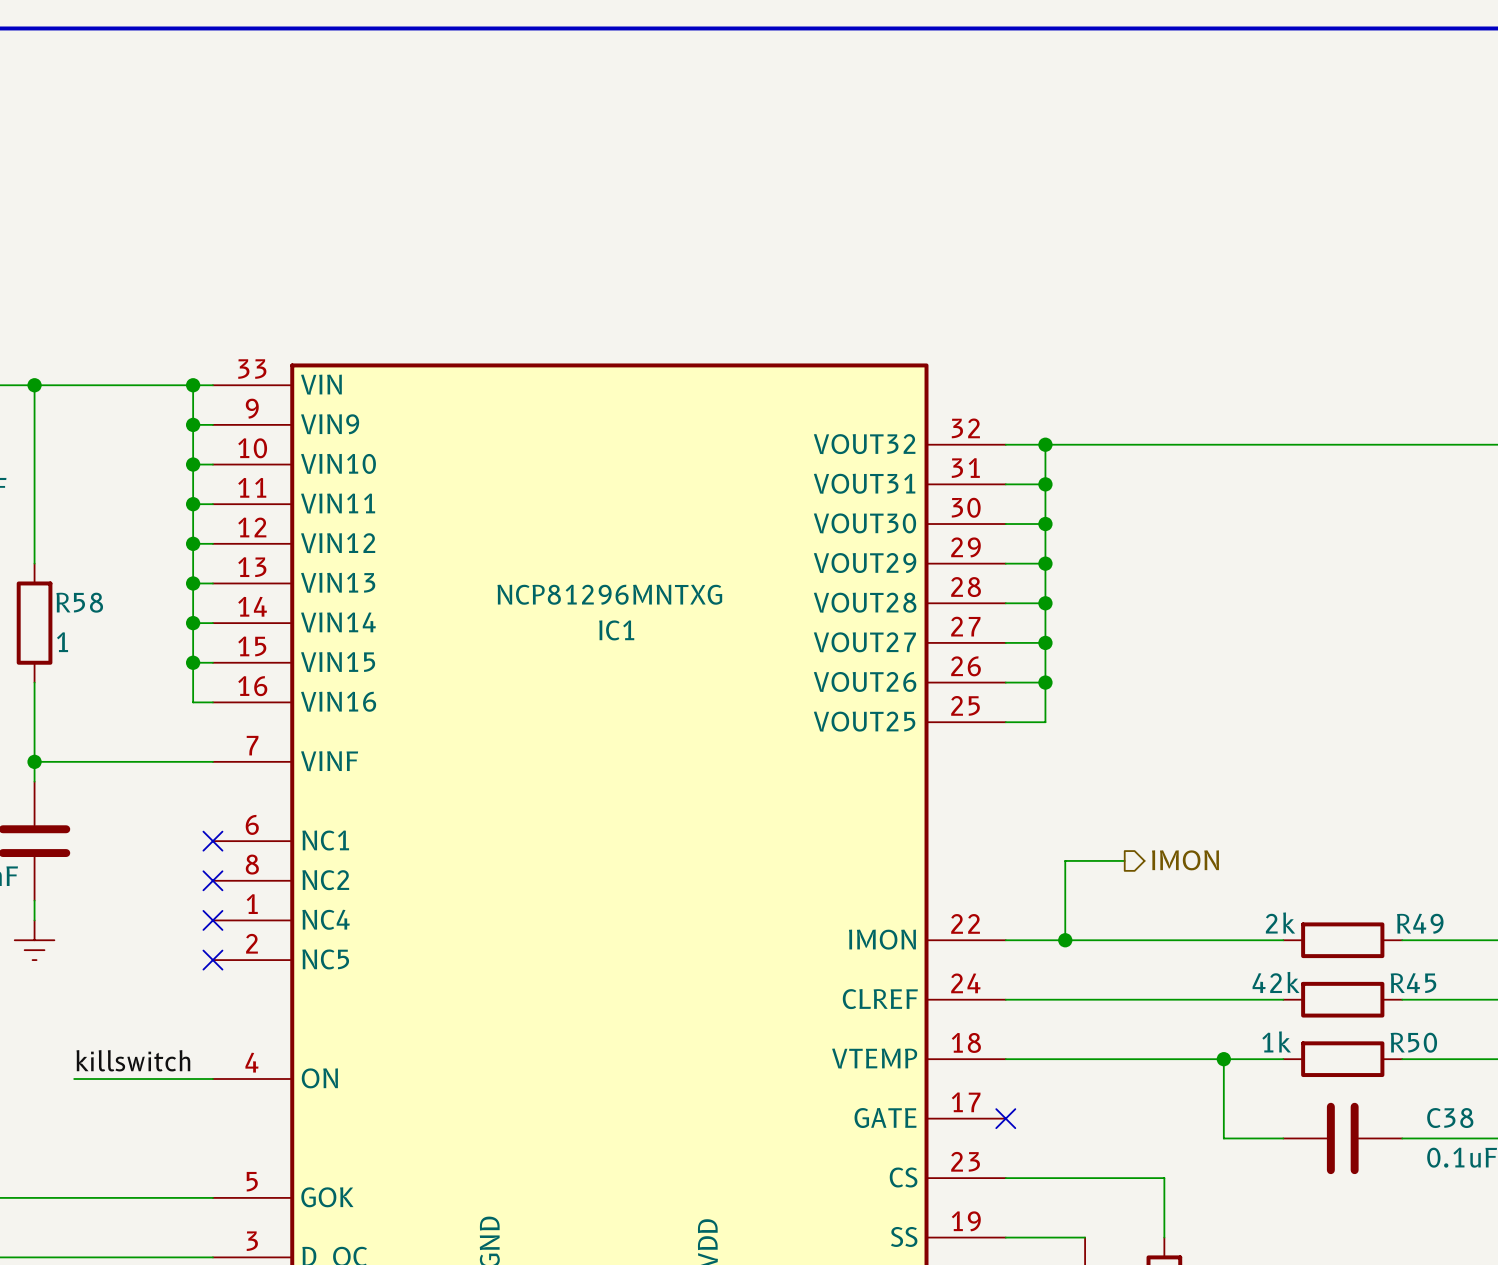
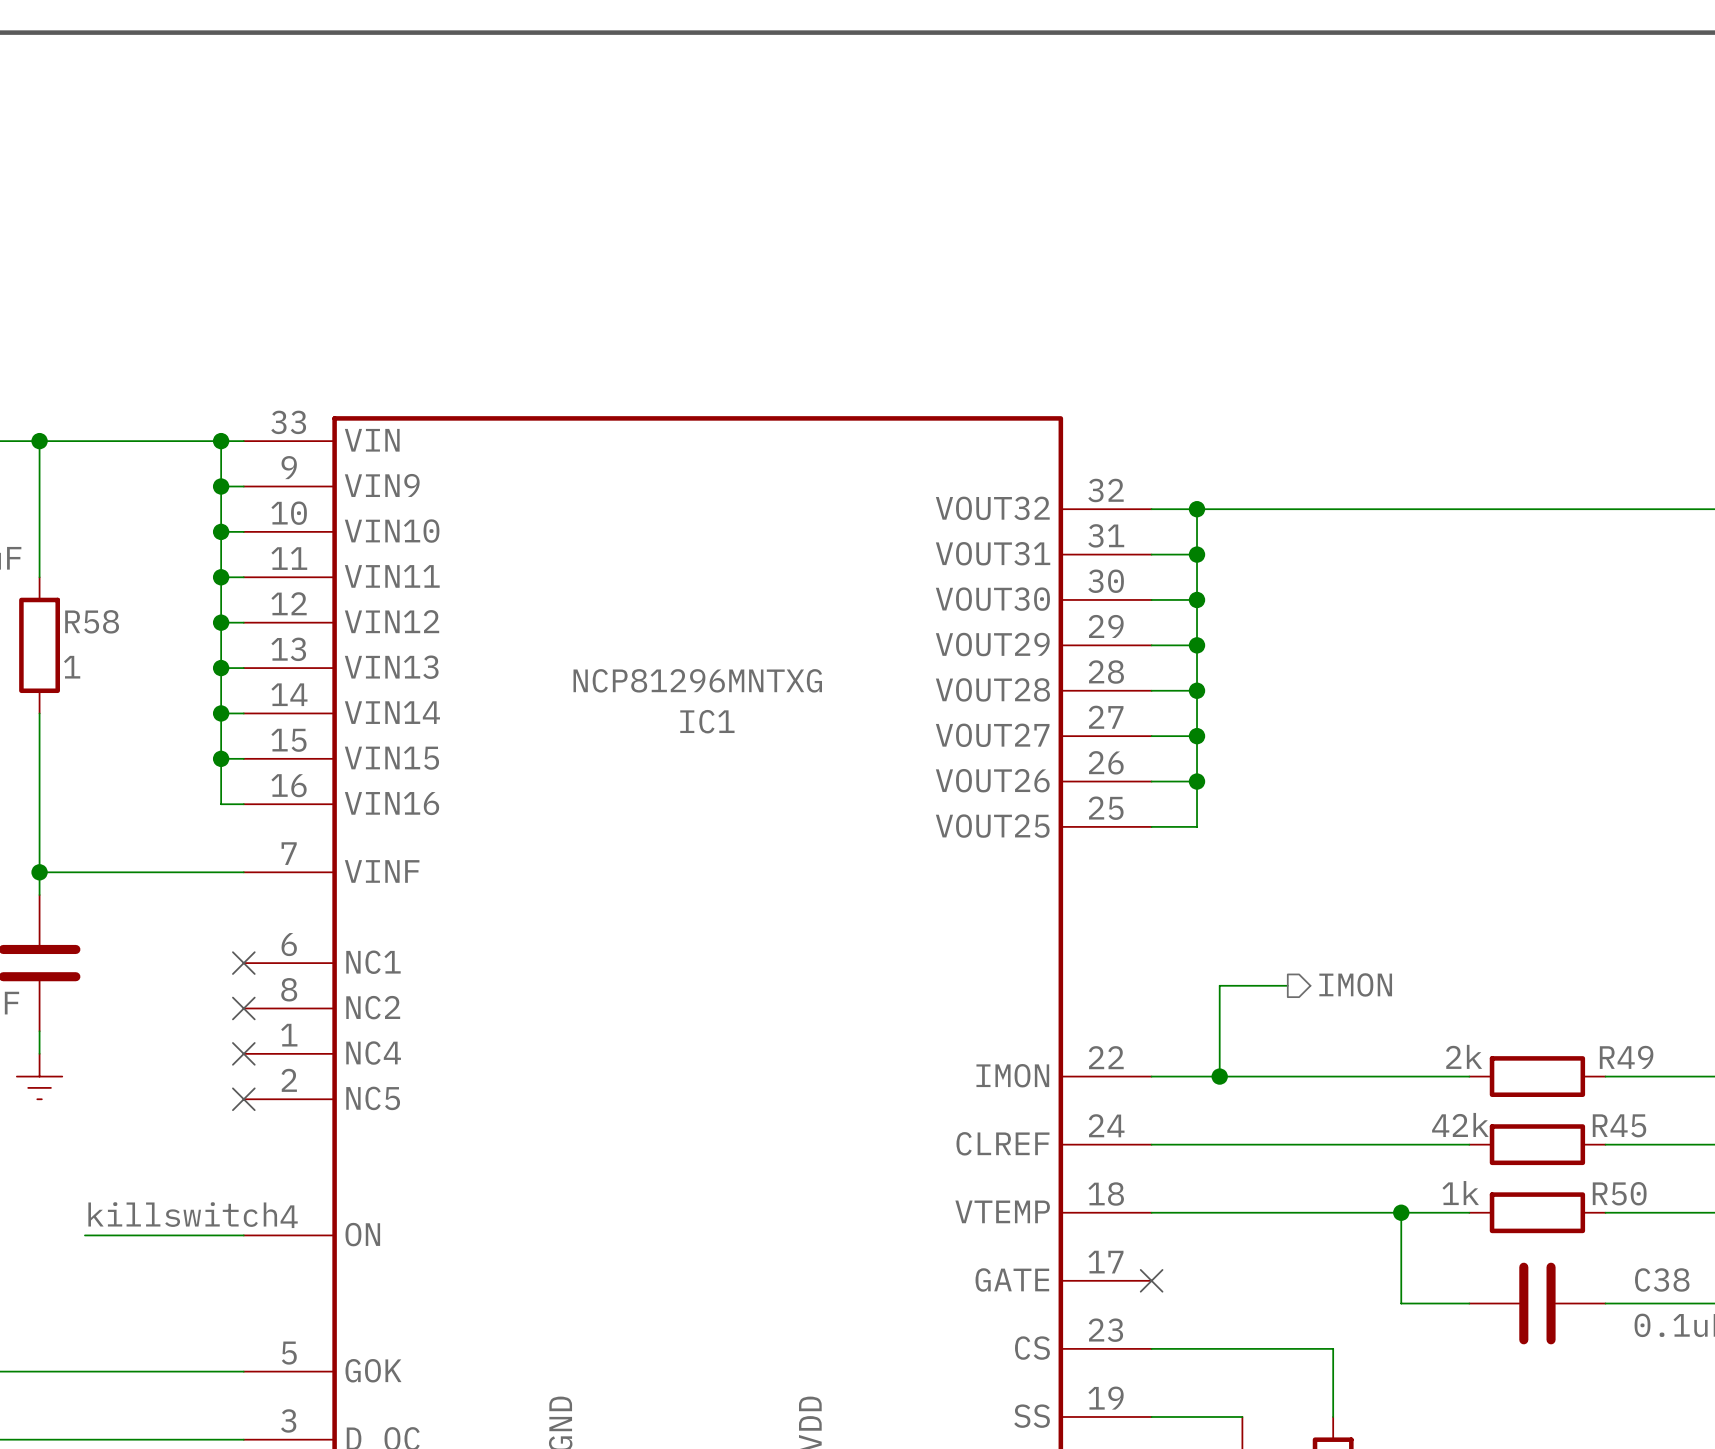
wire: (34, 504) (34, 563) -> (39, 713) (39, 781)
R58 position: (34, 623) -> (39, 645)

